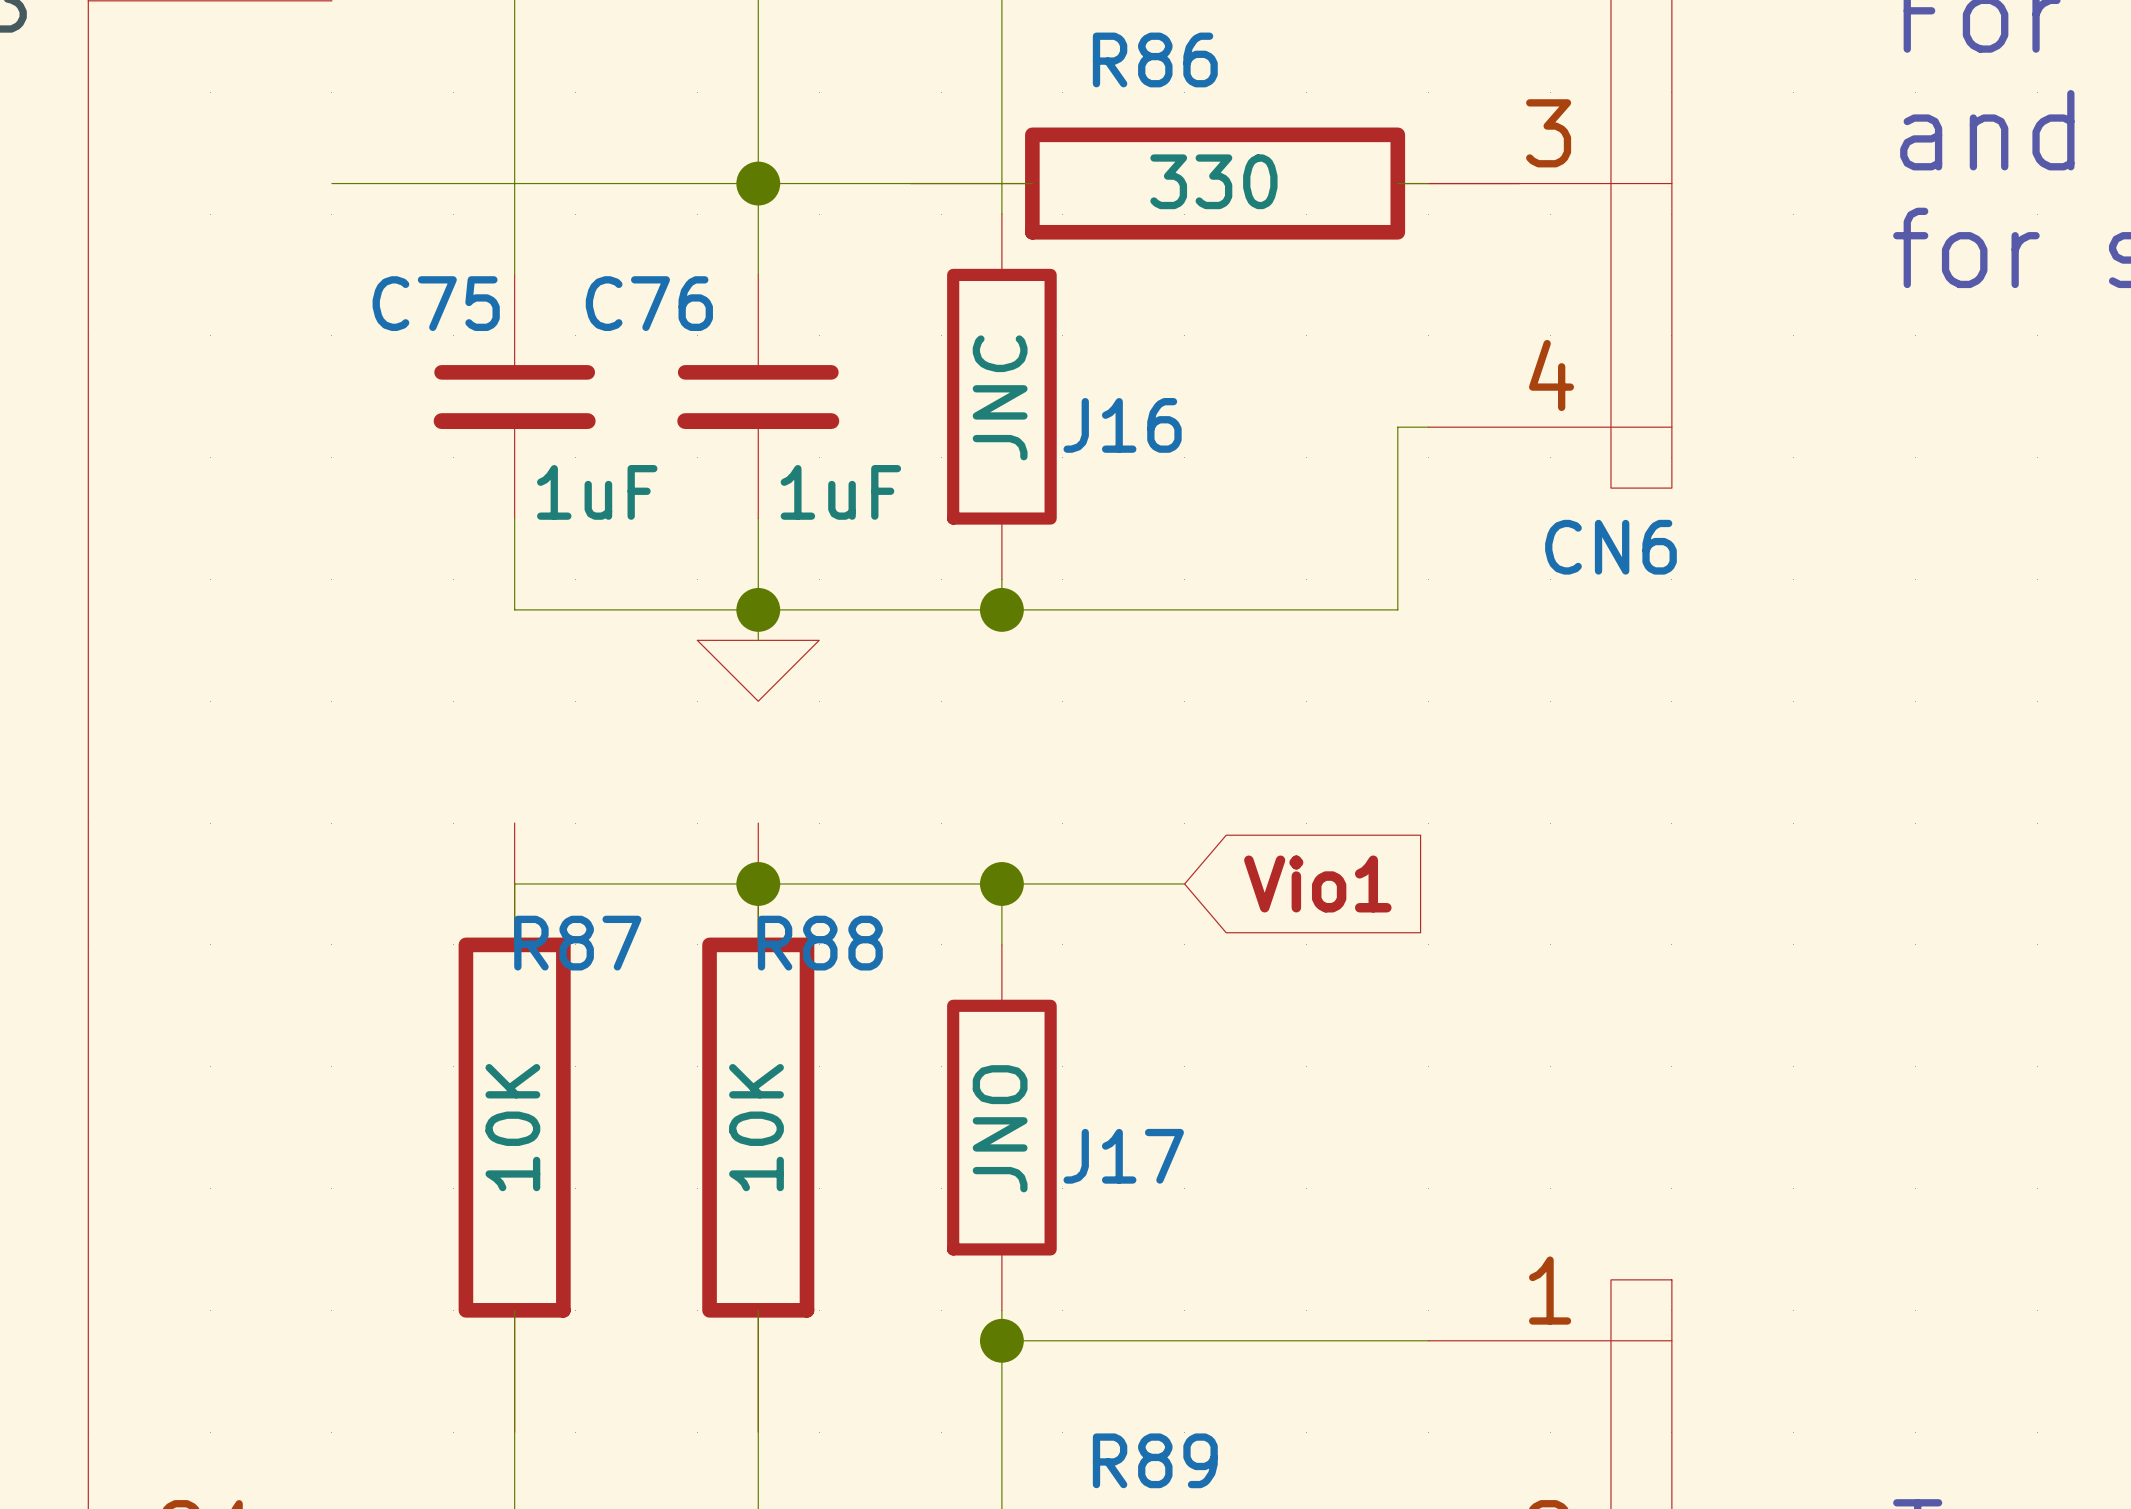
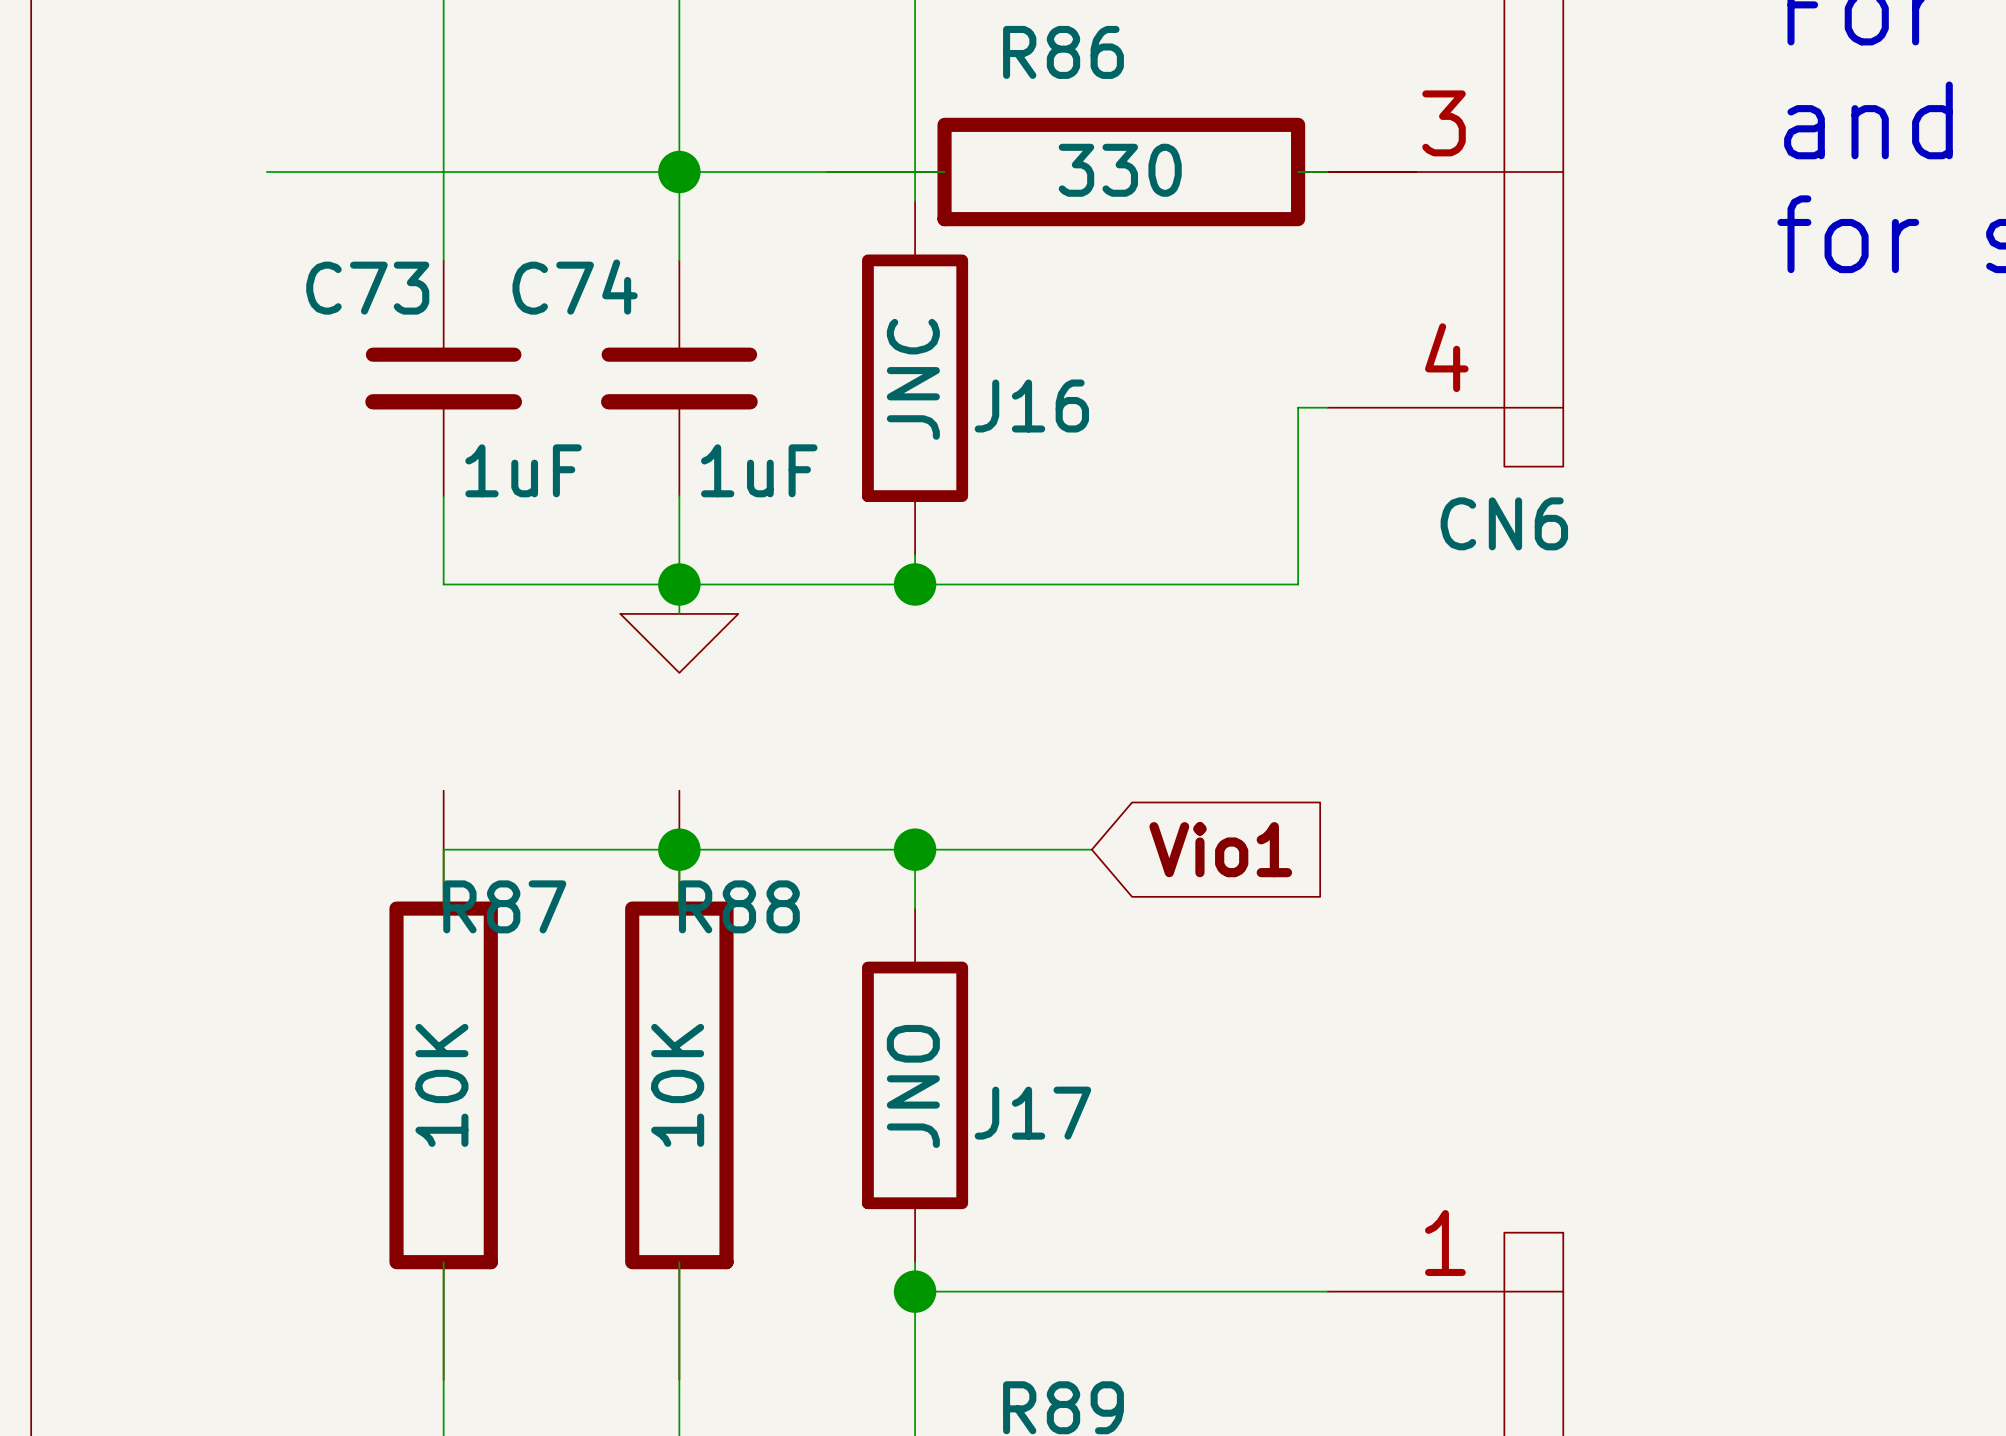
C75 name: C75 (436, 303) -> C73 (367, 288)
C76 name: C76 (649, 303) -> C74 (575, 287)

